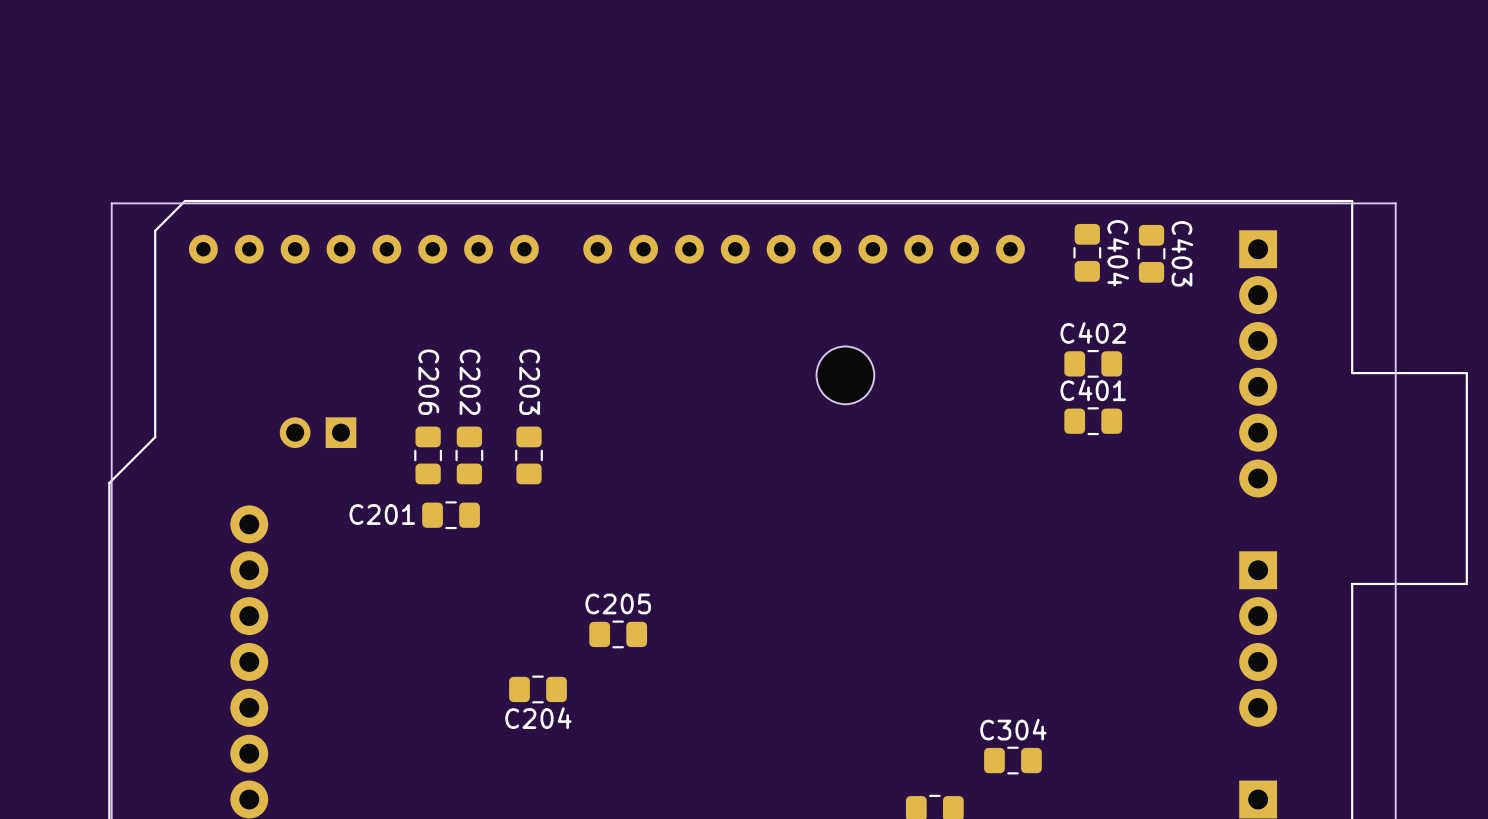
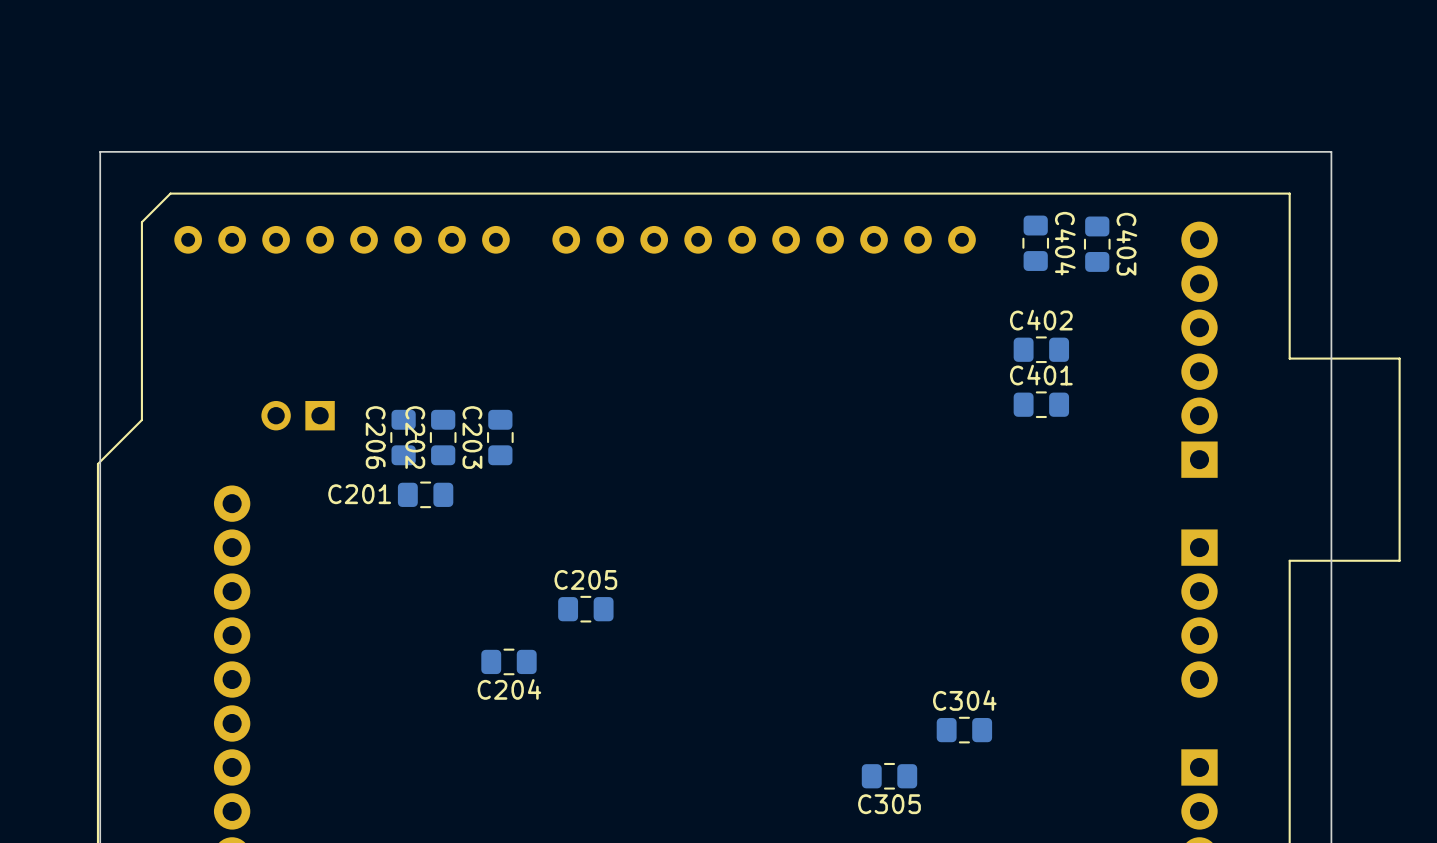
board edge: (1395, 203) (111, 203) -> (1331, 195) (1331, 151) (100, 151) (100, 195)
part rotation: 0° (1258, 363) -> 180° (1199, 349)
part: (845, 375) -> none
C206 name position: C206 (428, 382) -> C206 (375, 437)
C202 name position: C202 (470, 382) -> C202 (415, 437)
C203 name position: C203 (529, 382) -> C203 (472, 437)

